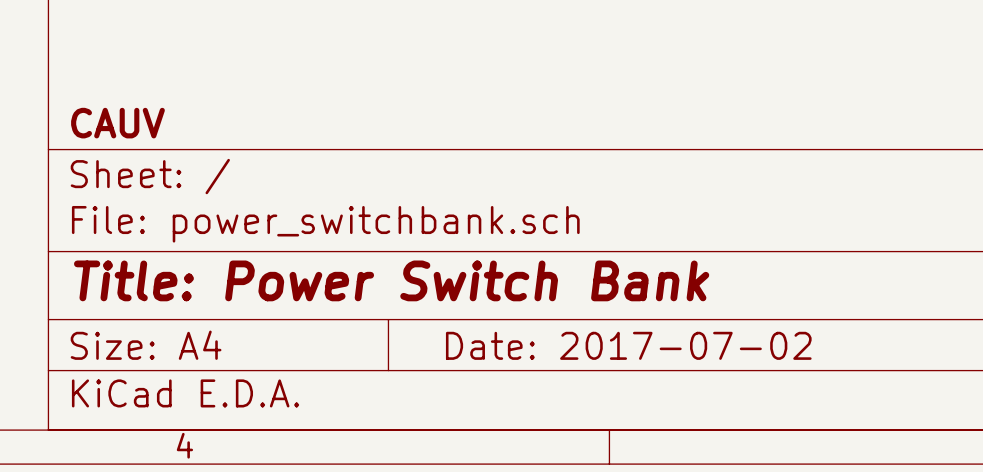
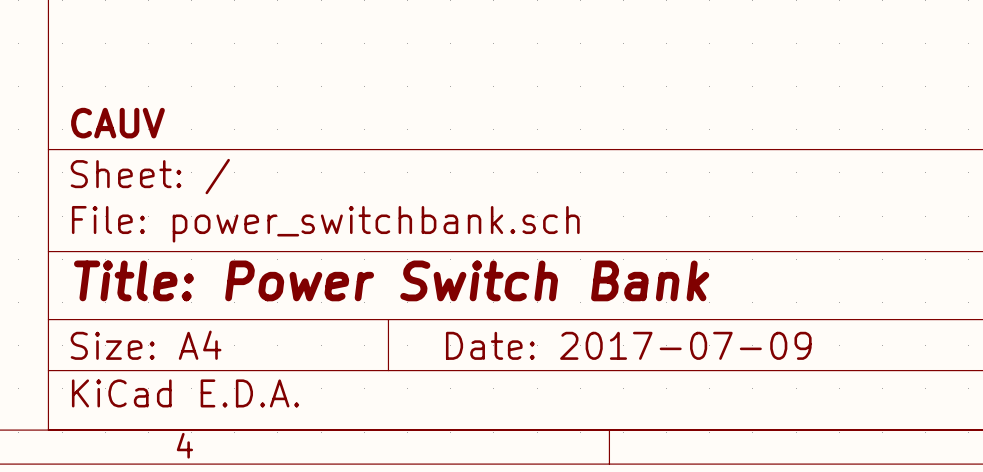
title block: Date: 2017-07-02 (628, 345) -> Date: 2017-07-09 (628, 345)

